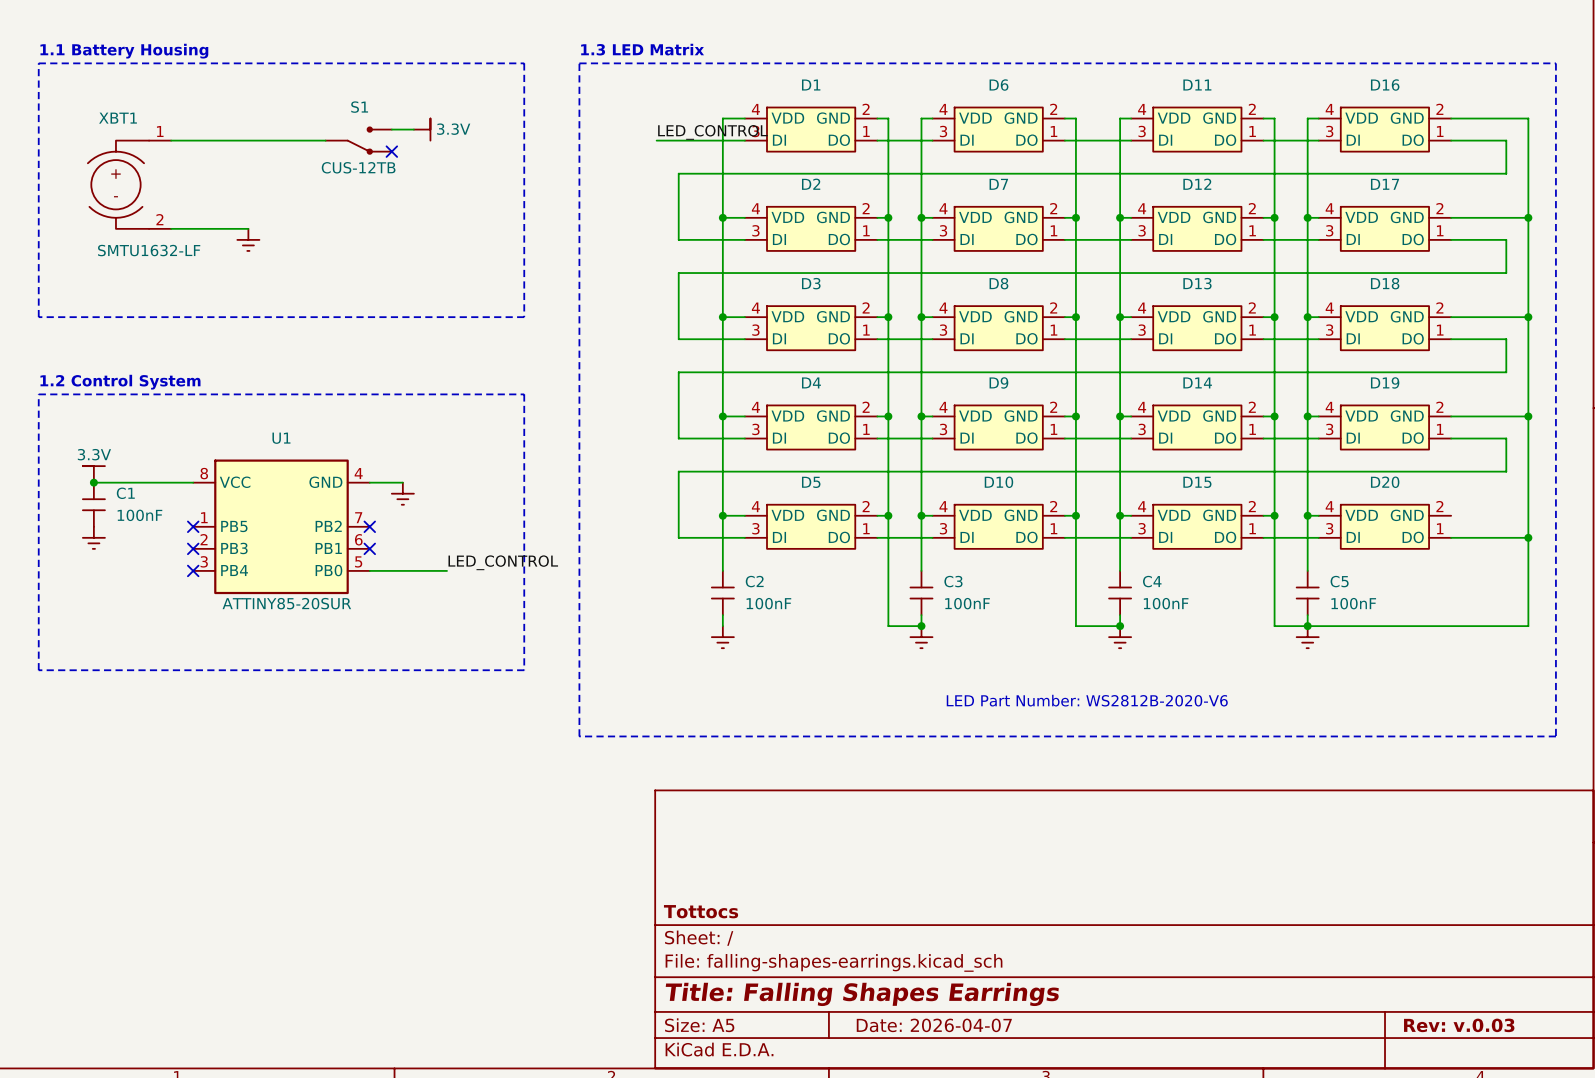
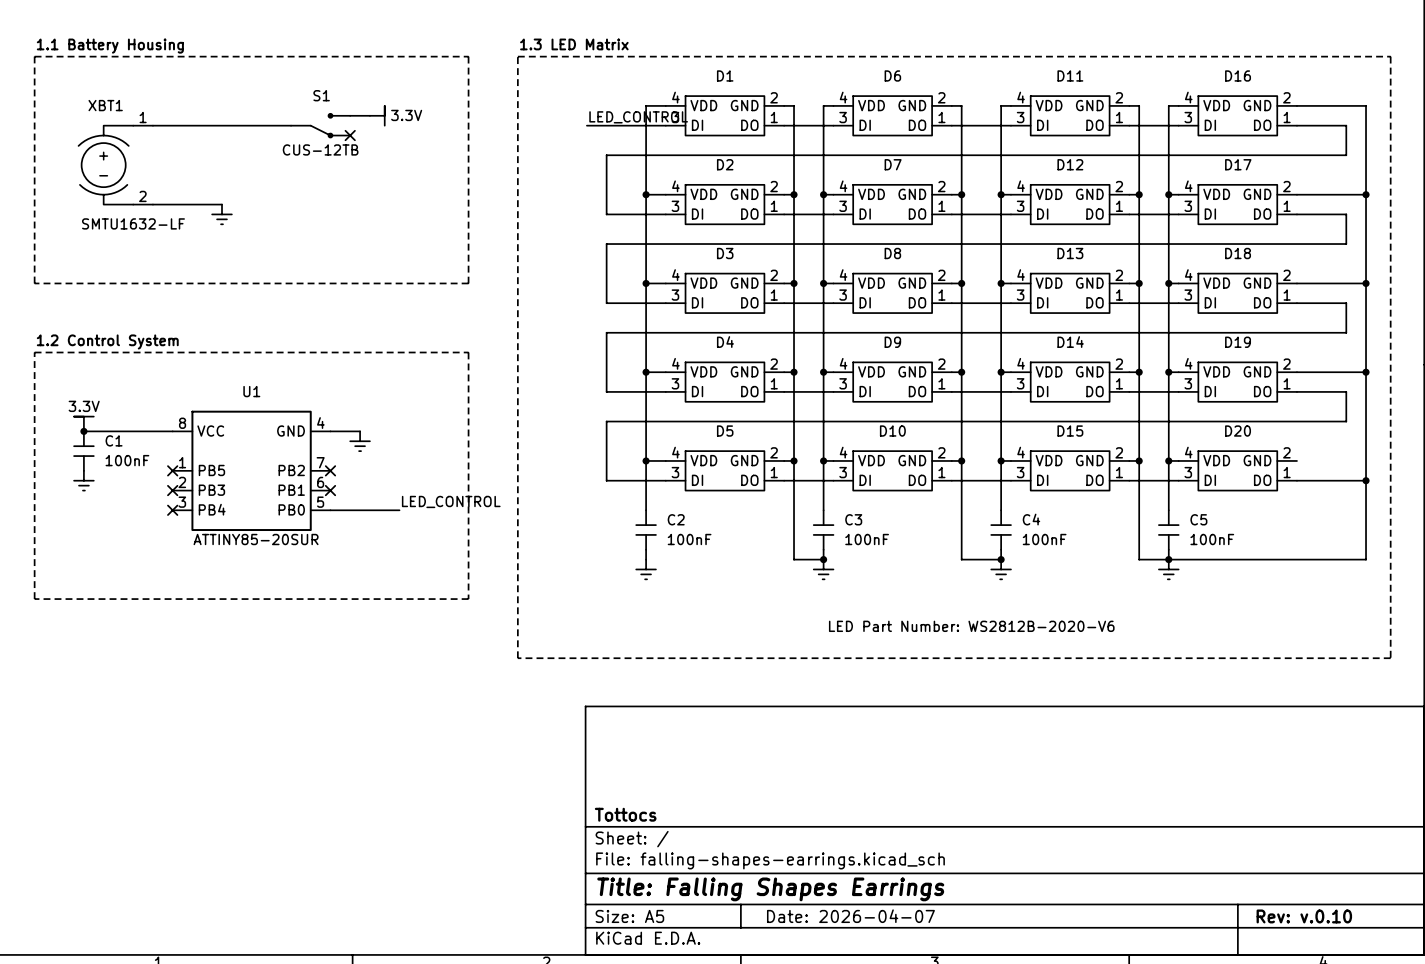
title block: Rev: v.0.03 (1459, 1025) -> Rev: v.0.10 (1304, 916)

